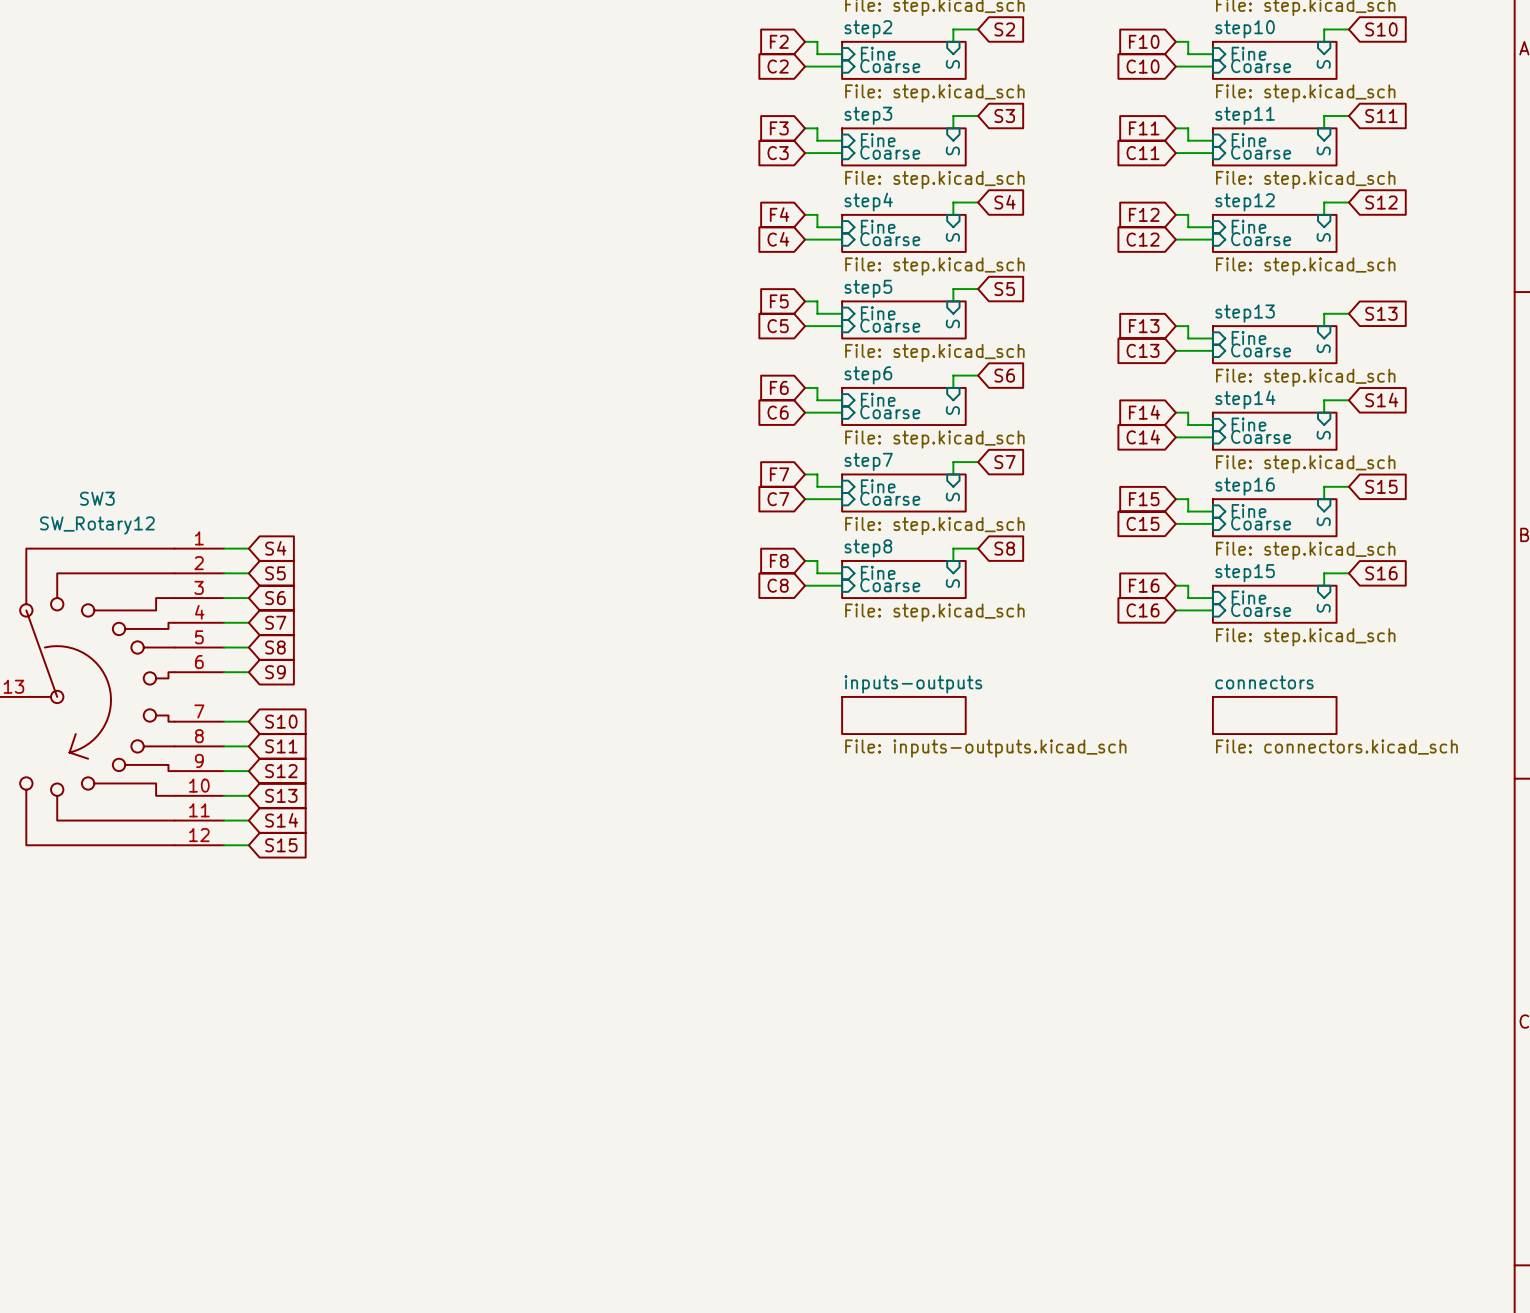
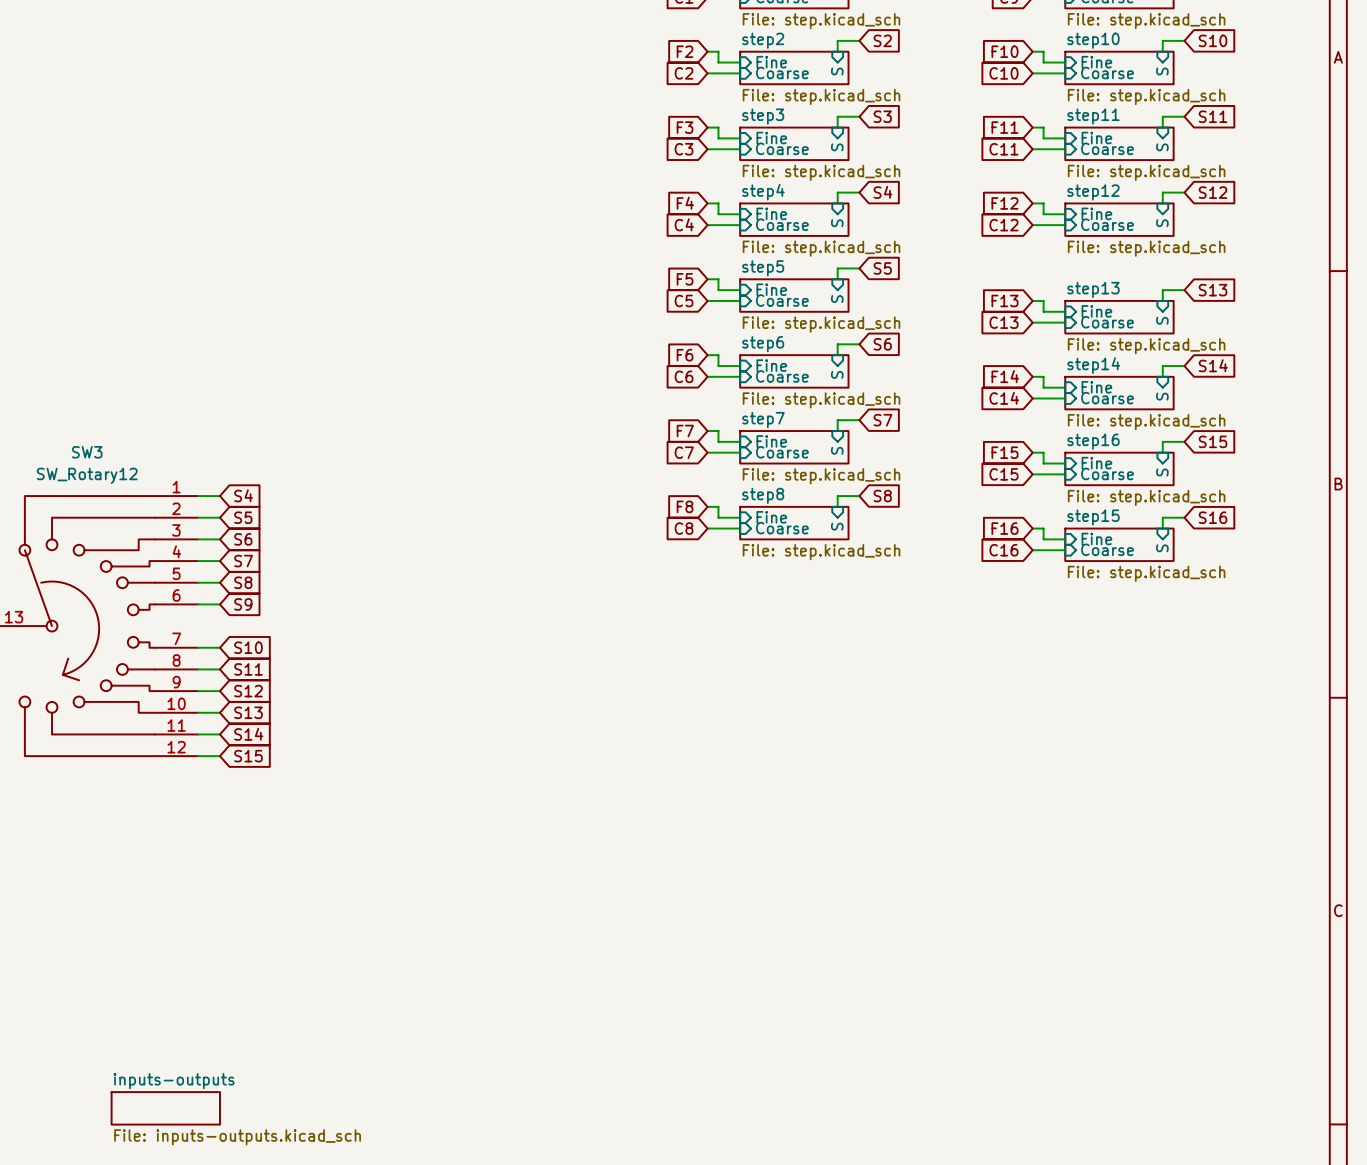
sheet inputs-outputs: File: inputs-outputs.kicad_sch (903, 715) -> none
sheet connectors: File: connectors.kicad_sch (1274, 715) -> none
sheet inputs-outputs: none -> File: inputs-outputs.kicad_sch (165, 1108)

